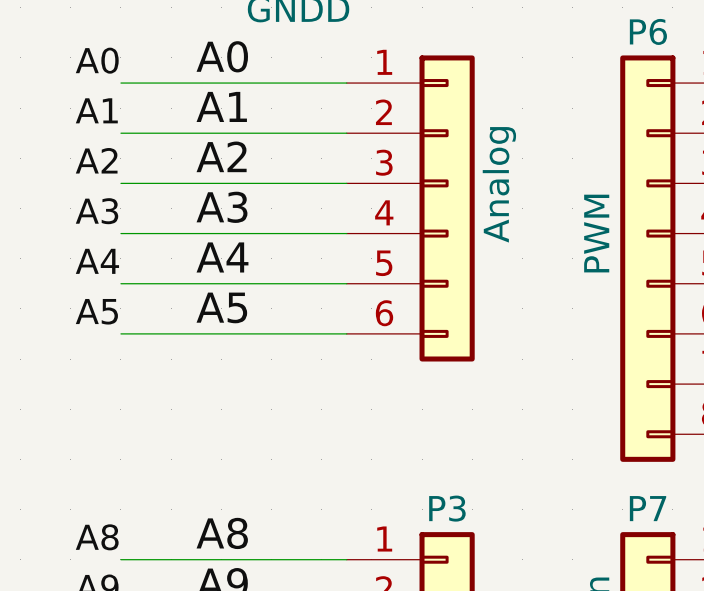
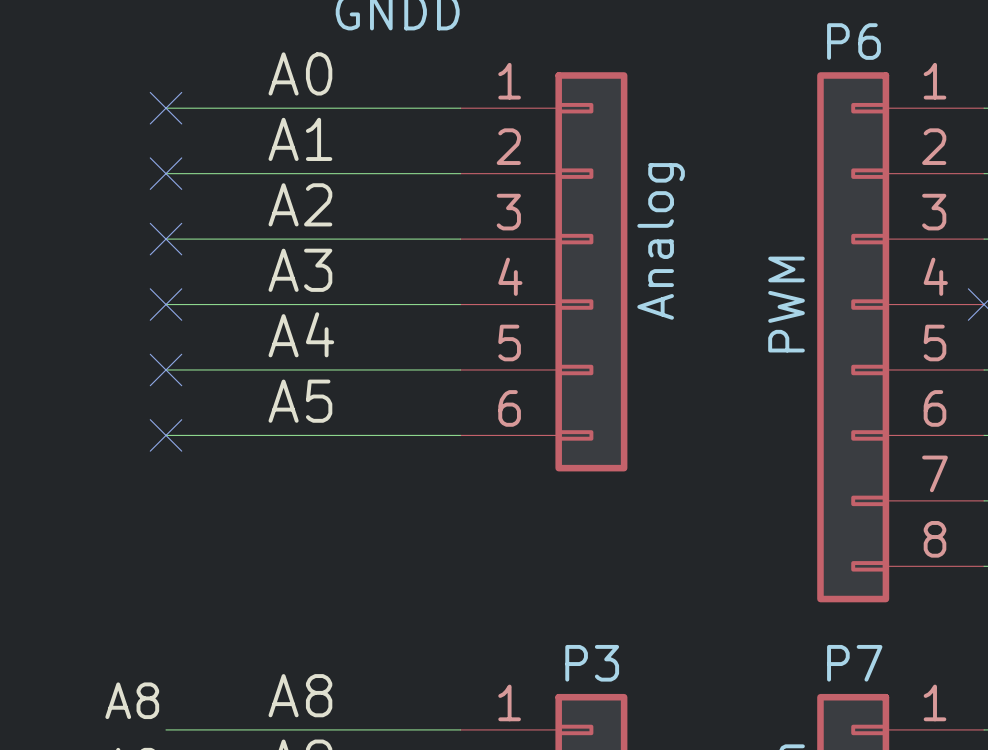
label: A0 (97, 60) -> none
no-connect mark: none -> (166, 108)
label: A1 (96, 110) -> none
no-connect mark: none -> (166, 173)
label: A2 (96, 160) -> none
no-connect mark: none -> (166, 239)
label: A3 (97, 211) -> none
no-connect mark: none -> (166, 304)
label: A4 (97, 261) -> none
no-connect mark: none -> (166, 369)
label: A5 (96, 311) -> none
no-connect mark: none -> (166, 435)

